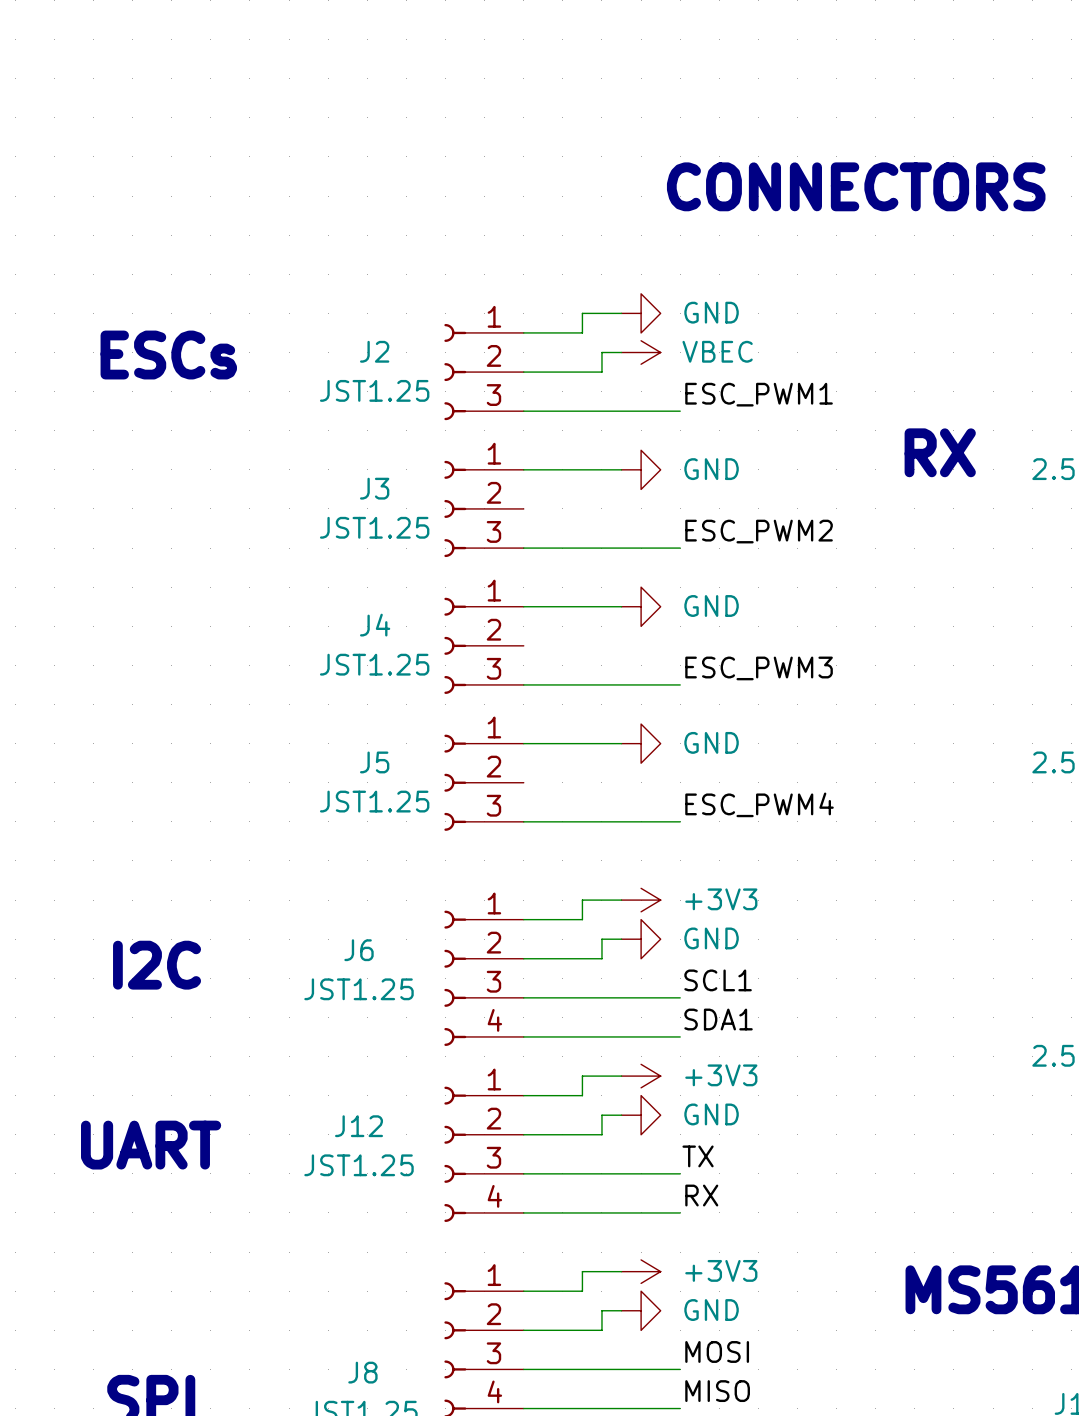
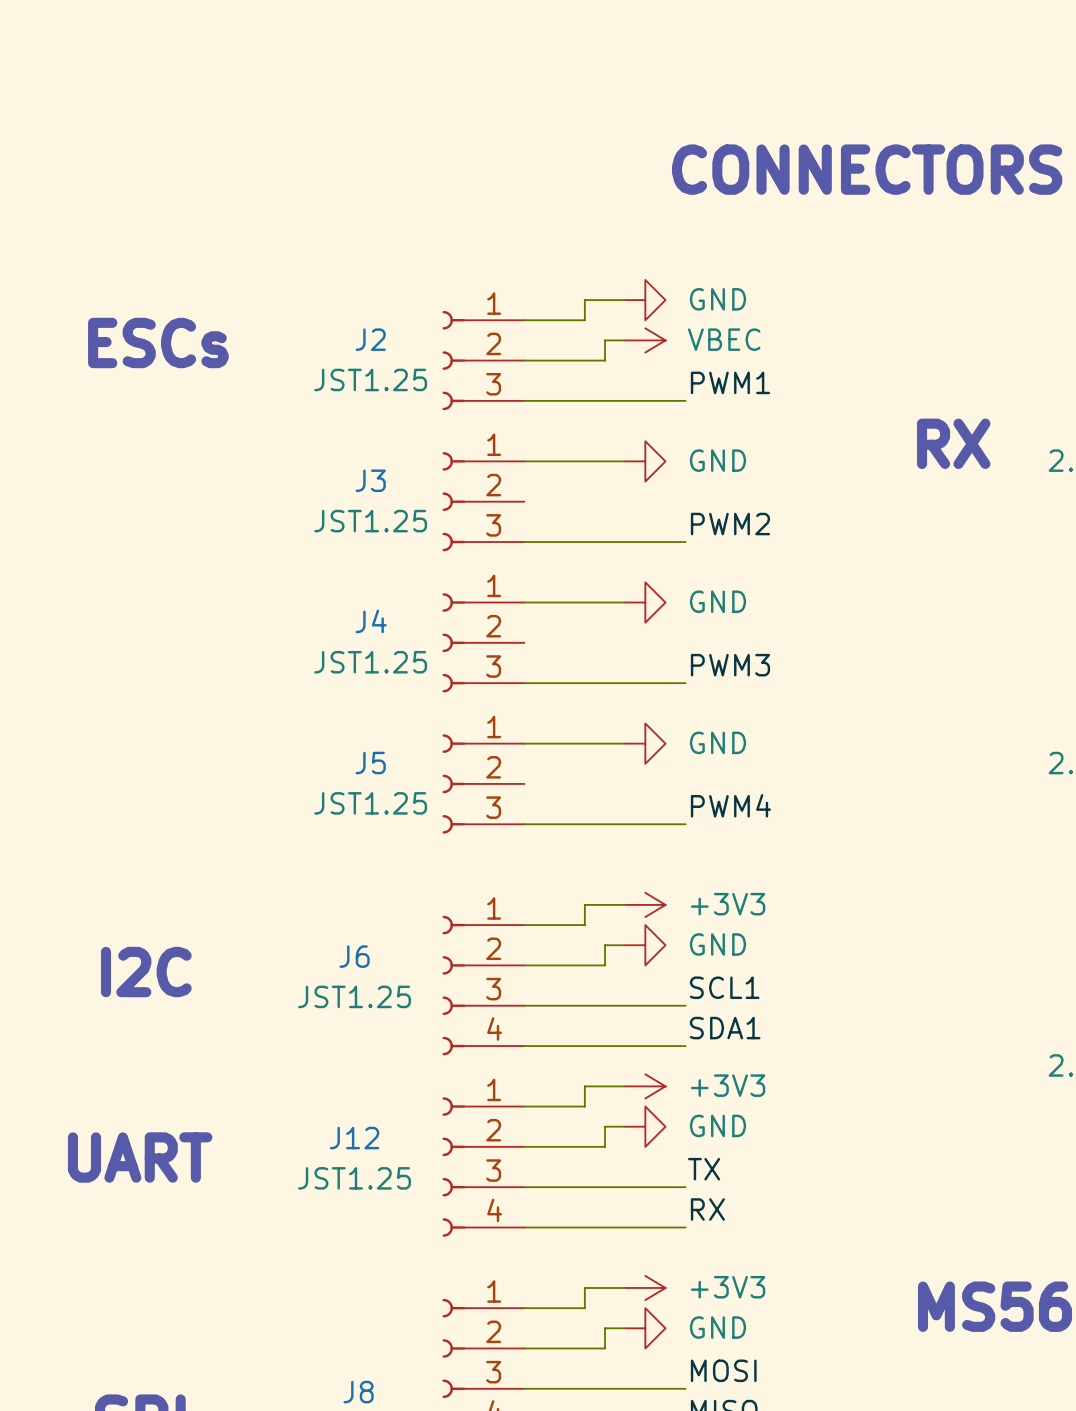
label: ESC_PWM1 (759, 394) -> PWM1 (730, 382)
label: ESC_PWM2 (759, 531) -> PWM2 (730, 524)
label: ESC_PWM3 (759, 668) -> PWM3 (730, 665)
label: ESC_PWM4 (759, 804) -> PWM4 (730, 805)

